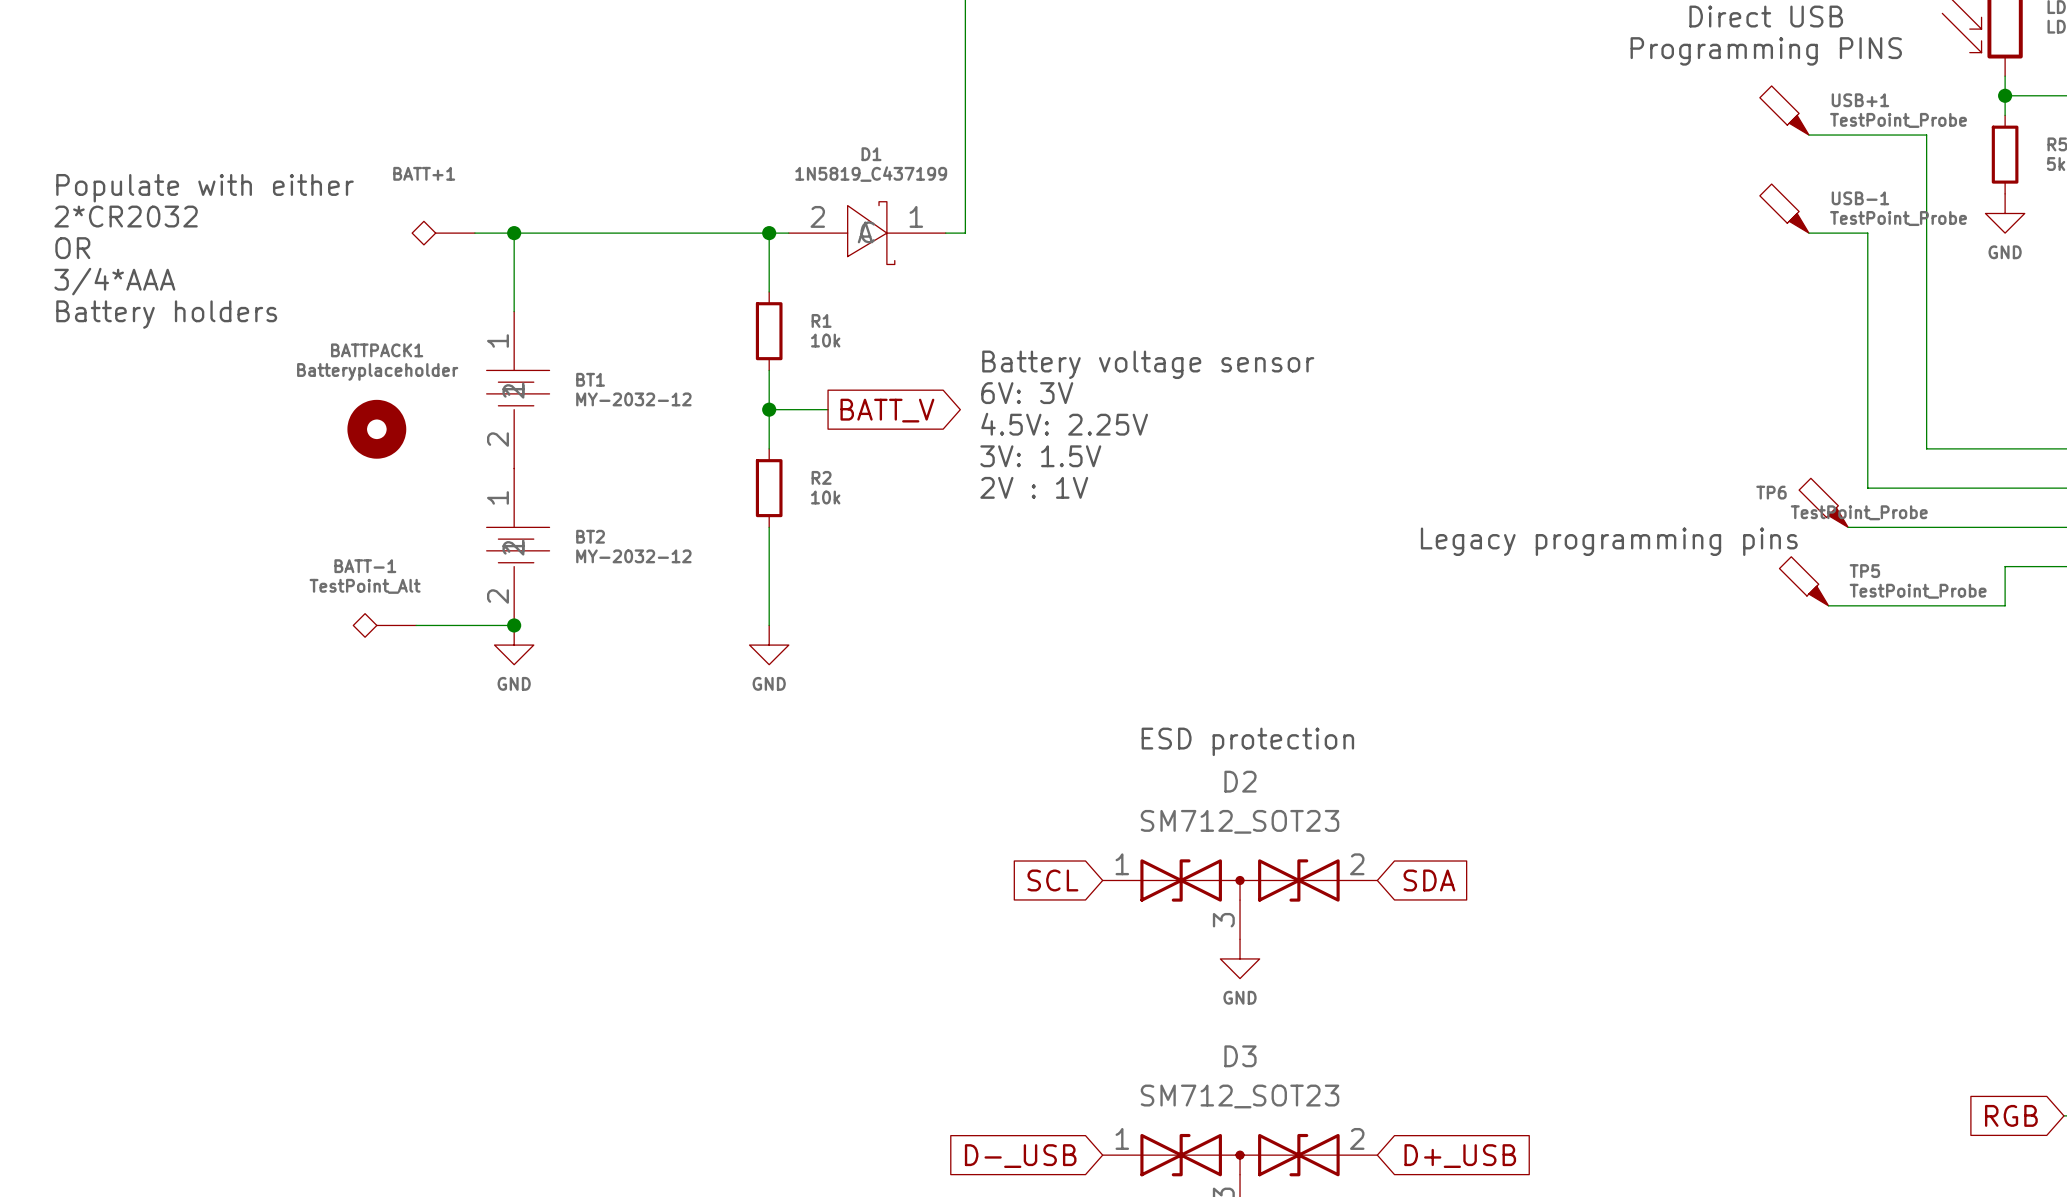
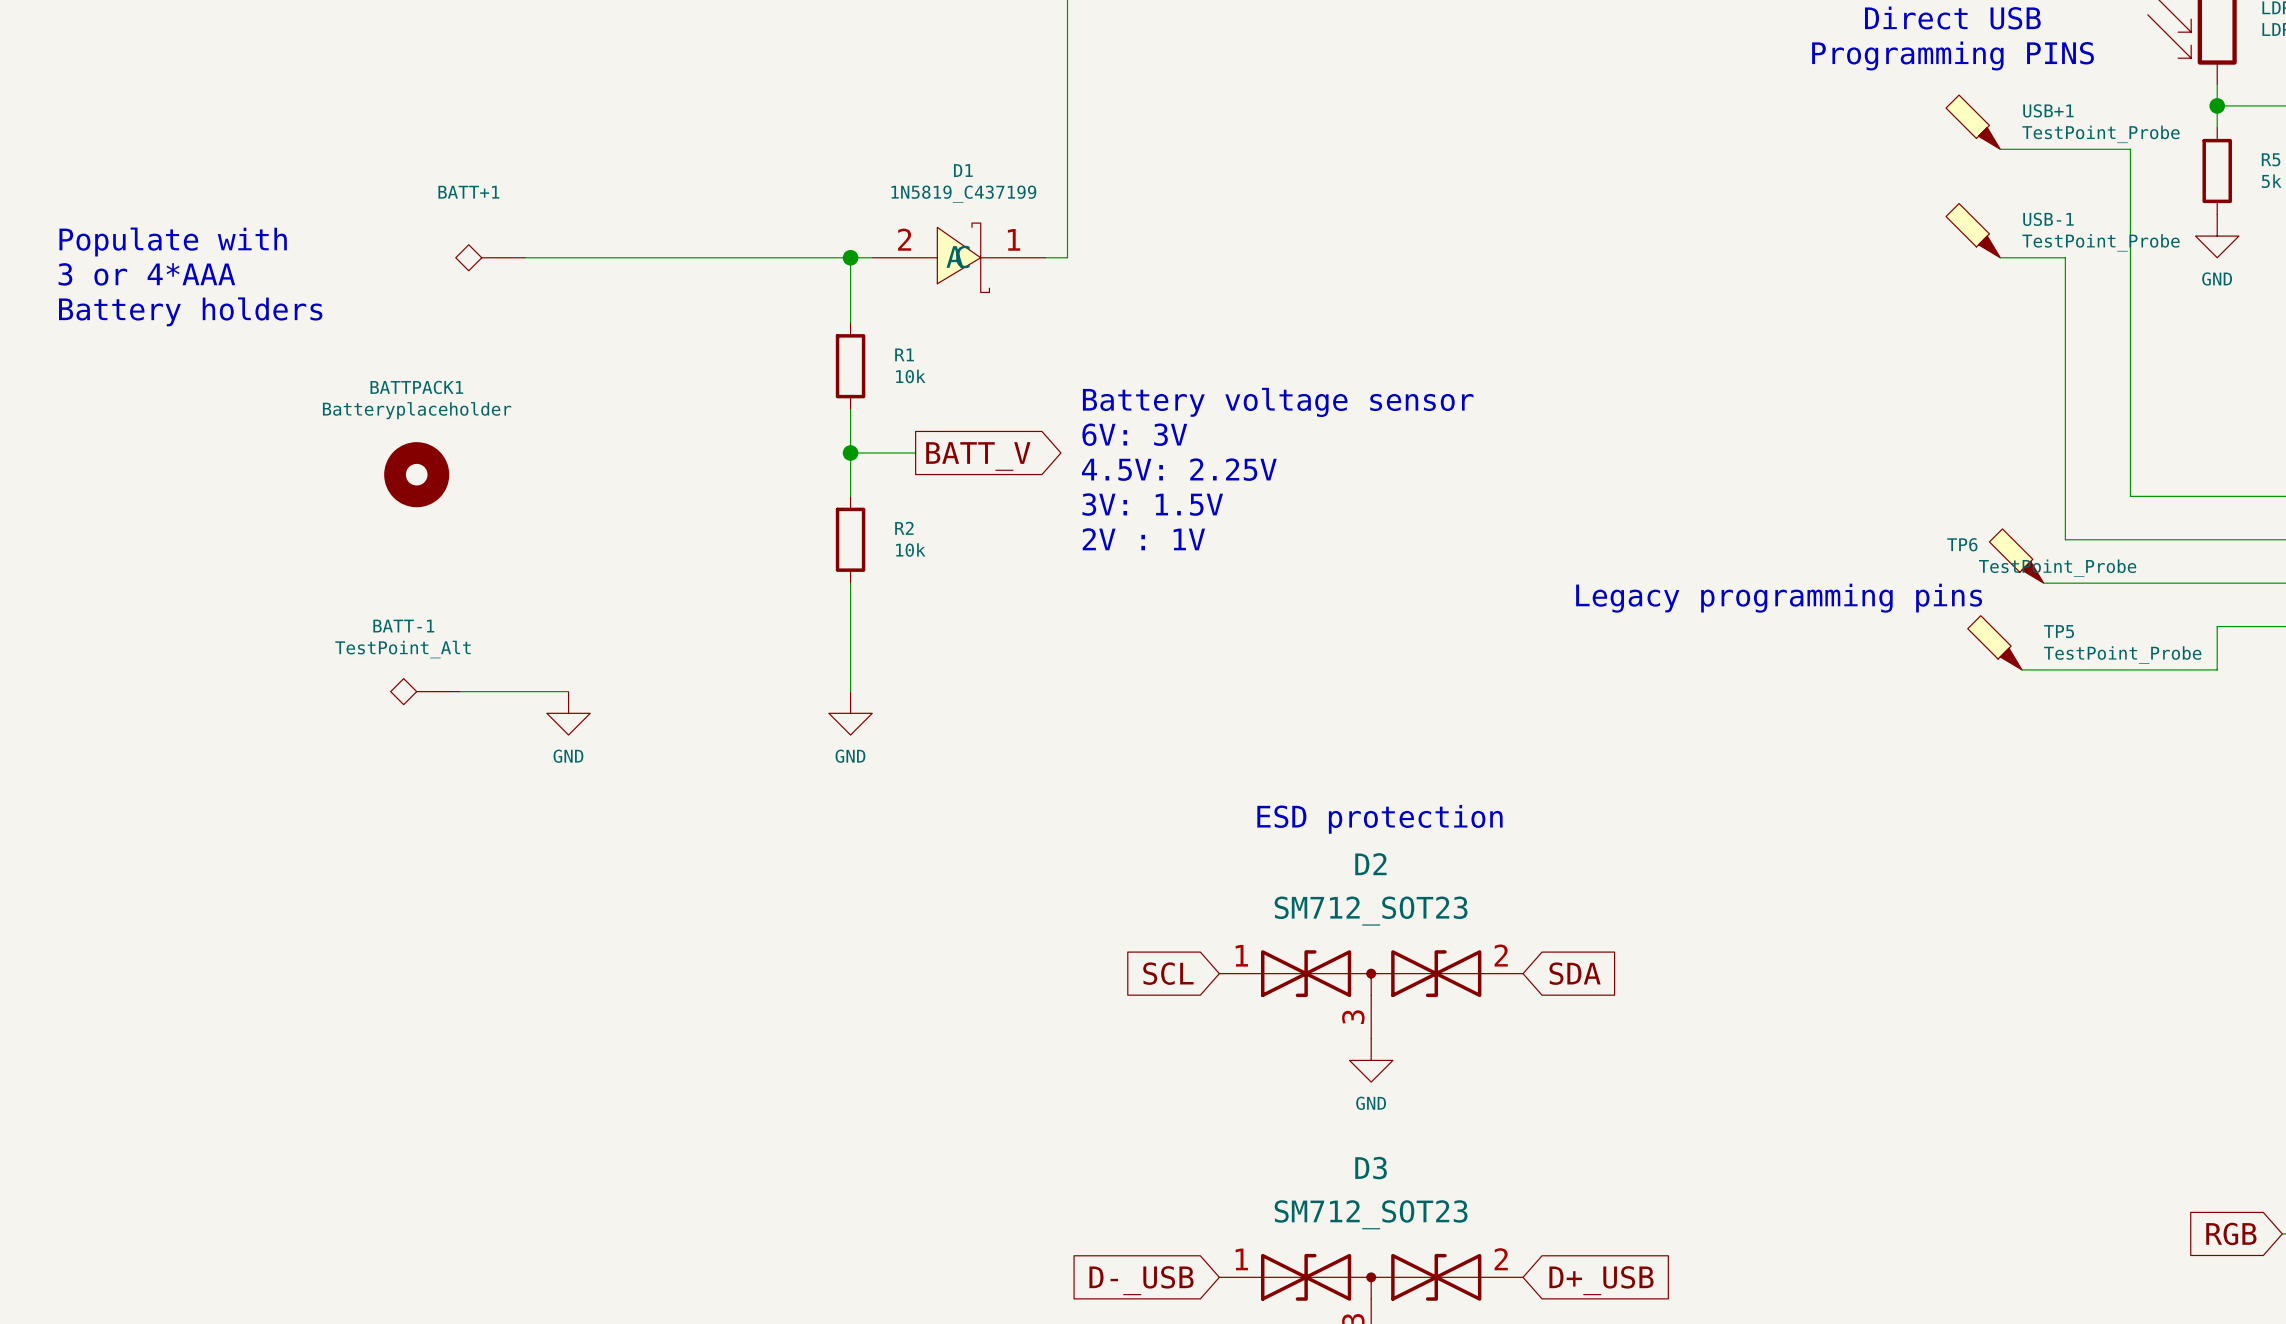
text: Populate with either (205, 188) -> none
text: 2*CR2032 (126, 216) -> Populate with (173, 242)
wire: (514, 233) (514, 311) -> none
junction: (514, 233) -> none
text: OR (72, 248) -> 3 or 4*AAA (146, 274)
text: 3/4*AAA (114, 281) -> Battery holders (190, 311)
text: Battery holders (166, 314) -> none
BT1: MY-2032-12 (518, 390) -> none
BT2: MY-2032-12 (518, 546) -> none
junction: (514, 625) -> none

